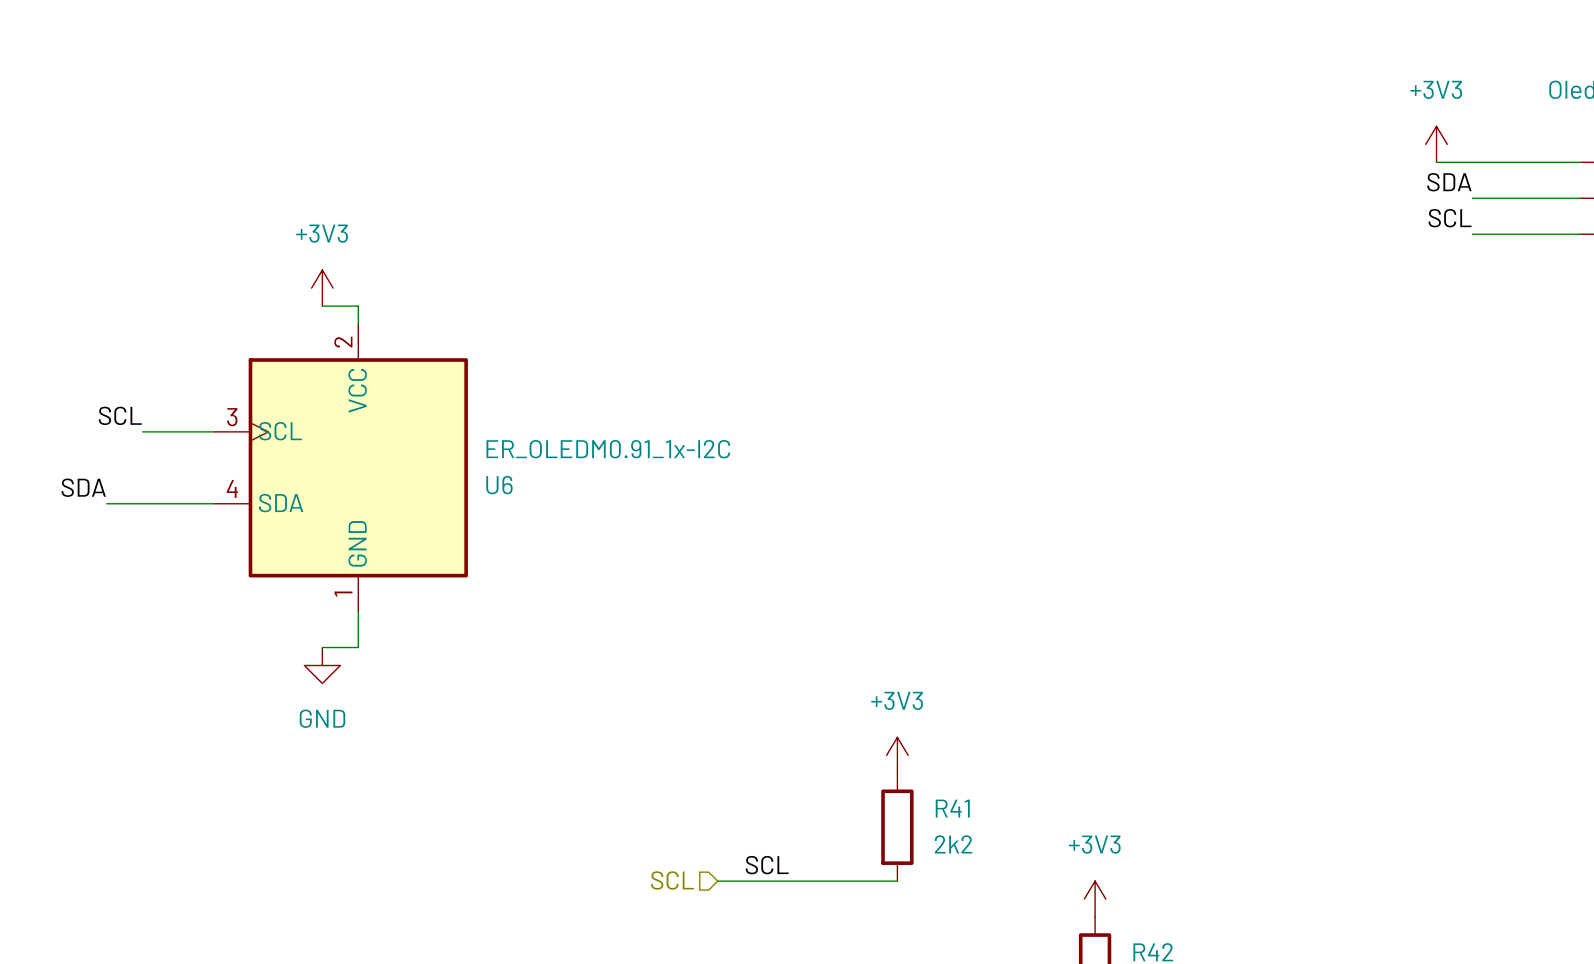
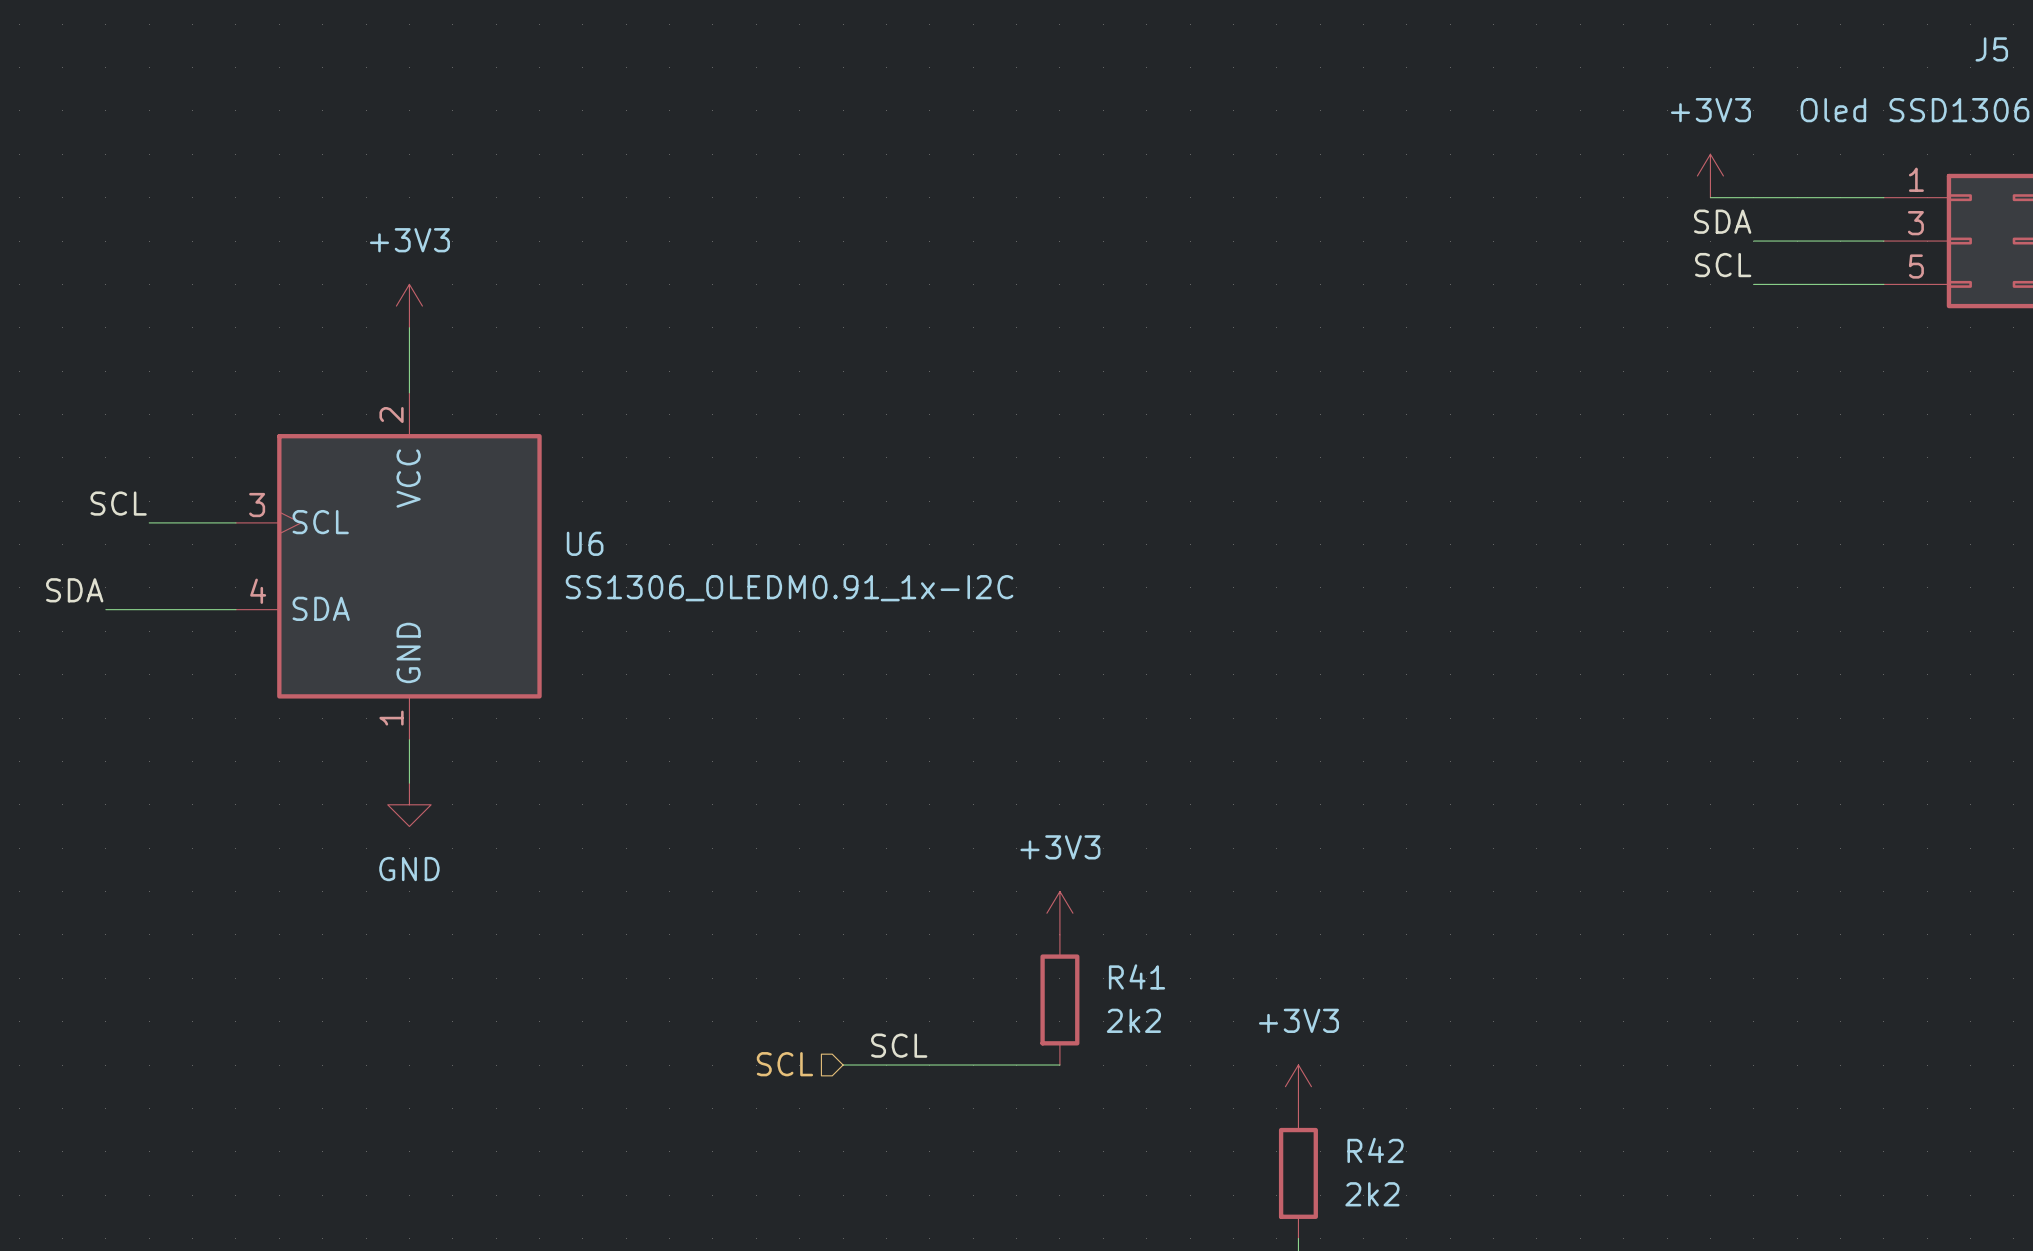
power symbol position: +3V3 (322, 288) -> +3V3 (409, 306)
wire: (322, 306) (358, 306) -> (409, 327) (409, 371)
U6 value: ER_OLEDM0.91_1x-I2C (608, 449) -> SS1306_OLEDM0.91_1x-I2C (789, 588)
U6 name position: U6 (499, 485) -> U6 (585, 543)
wire: (322, 647) (358, 647) -> none
power symbol position: GND (322, 665) -> GND (409, 804)

